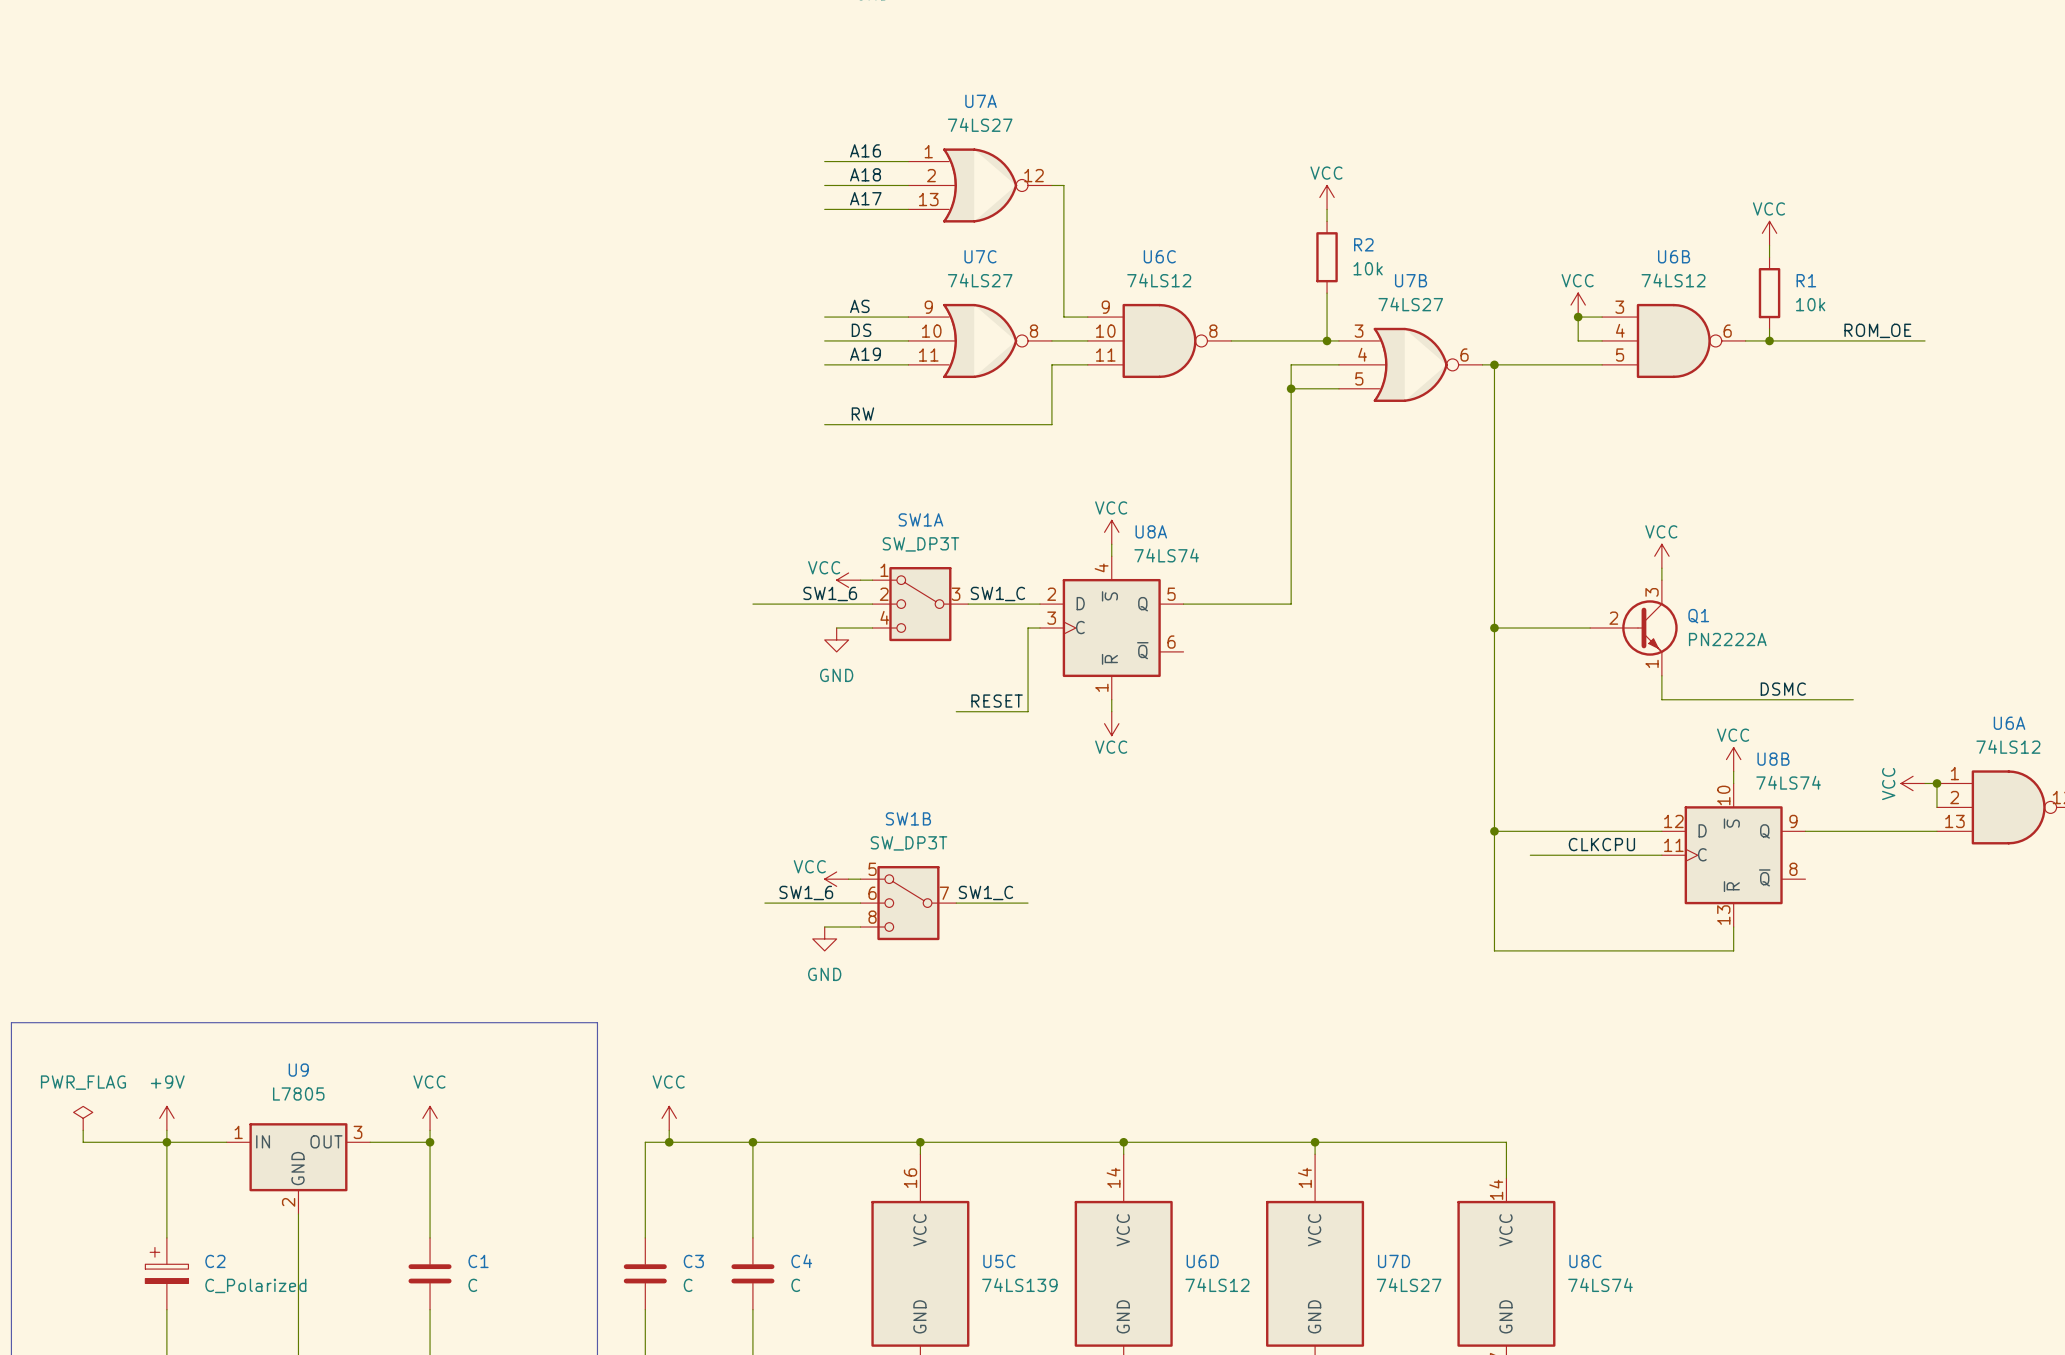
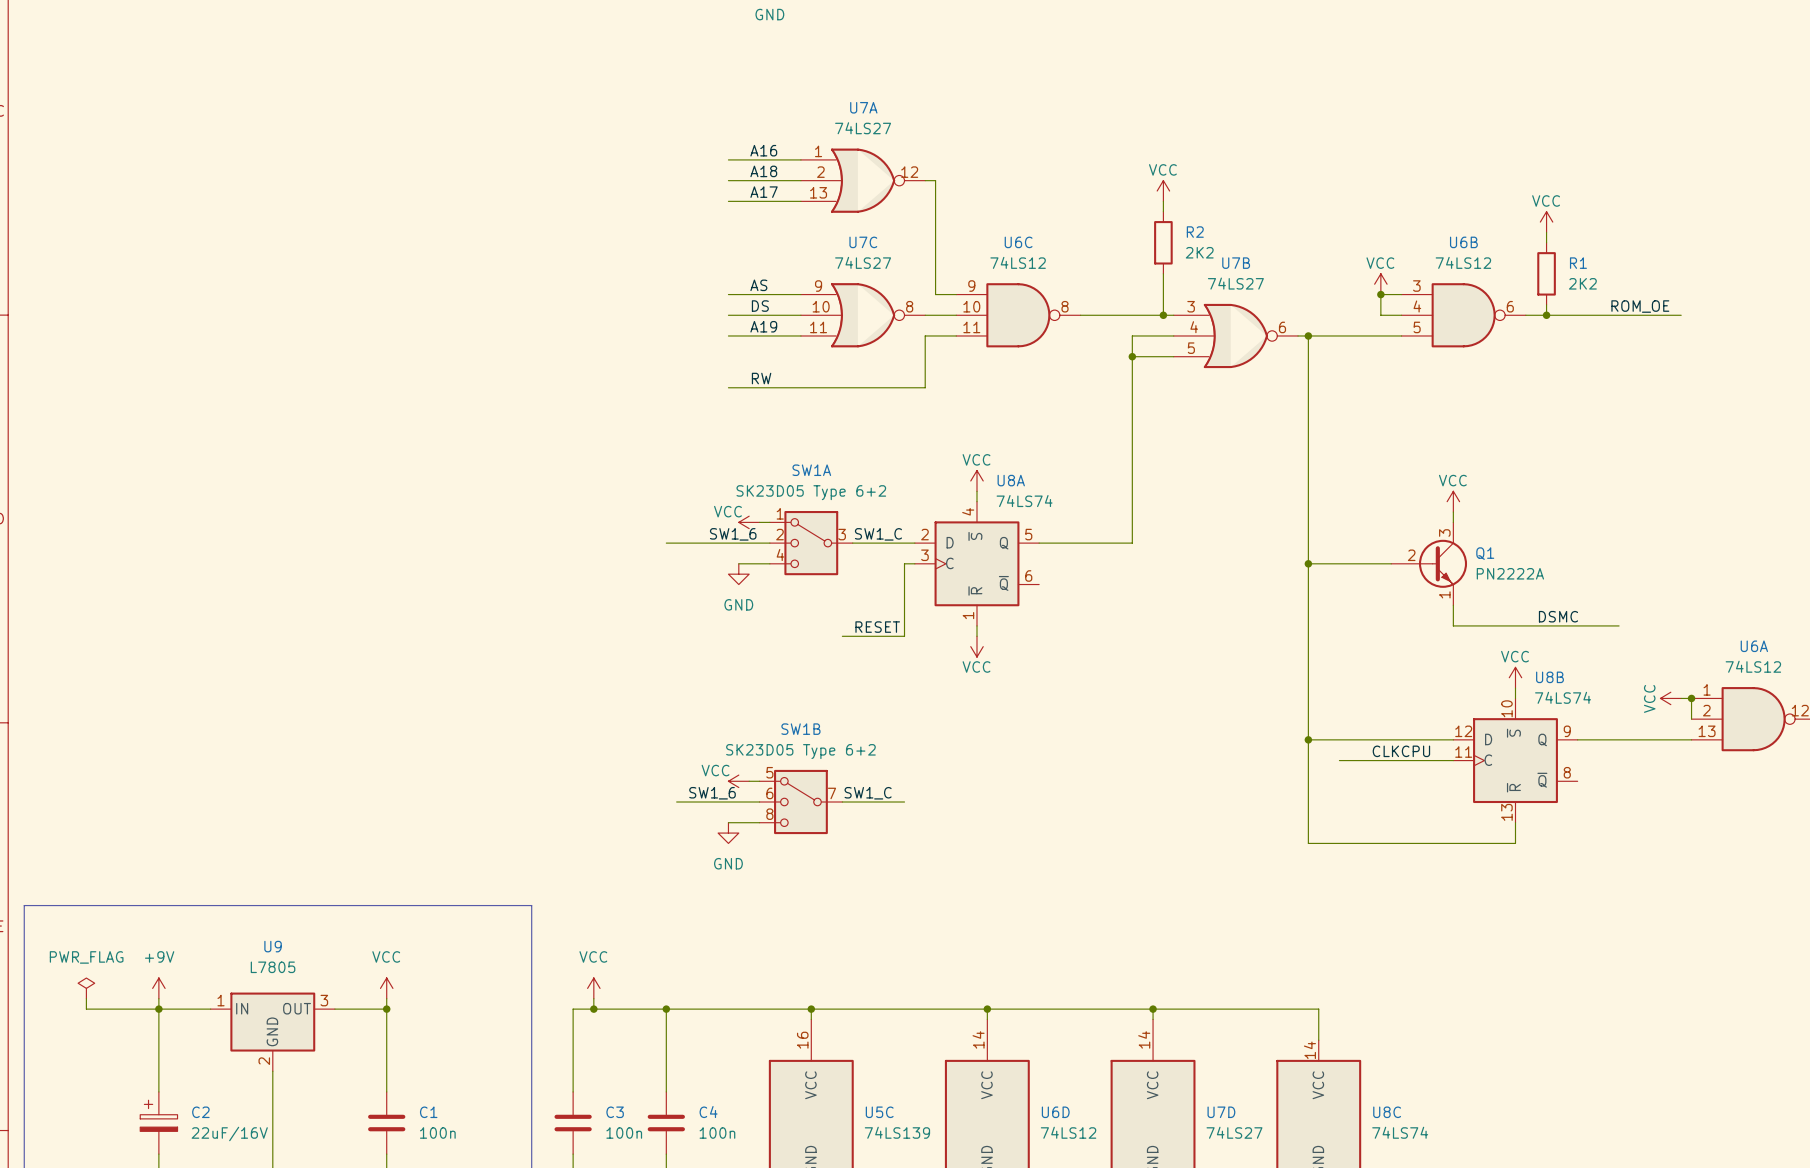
R2 value: 10k (1368, 268) -> 2K2 (1199, 252)
R1 value: 10k (1810, 304) -> 2K2 (1582, 283)
SW1A value: SW_DP3T (920, 544) -> SK23D05 Type 6+2 (811, 492)
SW1B value: SW_DP3T (908, 843) -> SK23D05 Type 6+2 (800, 751)
C2 value: C_Polarized (255, 1285) -> 22uF/16V (229, 1133)
C1 value: C (472, 1285) -> 100n (437, 1132)
C3 value: C (688, 1285) -> 100n (624, 1132)
C4 value: C (795, 1285) -> 100n (717, 1132)

